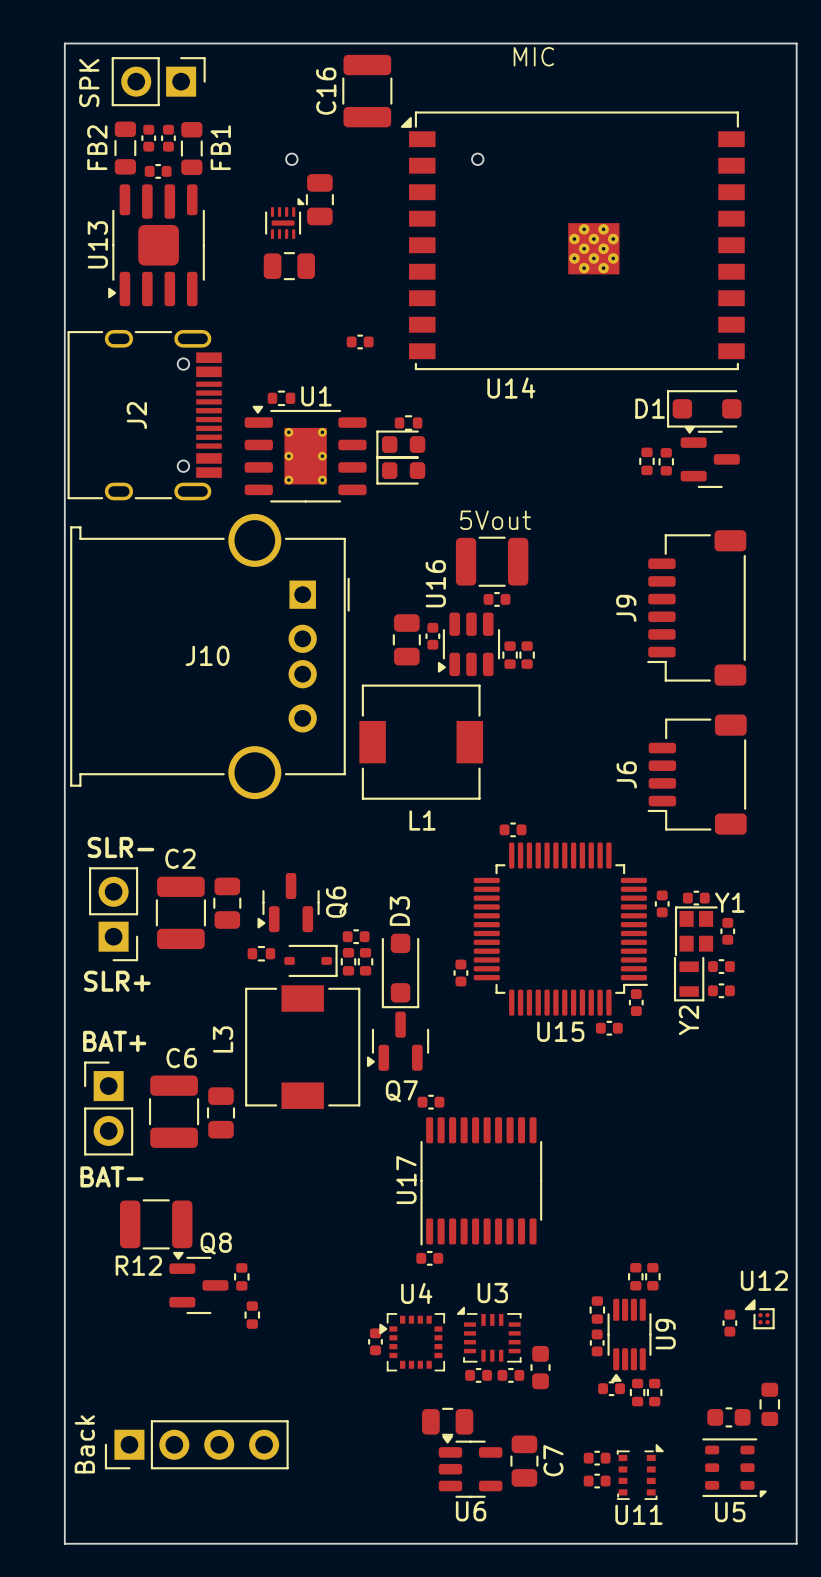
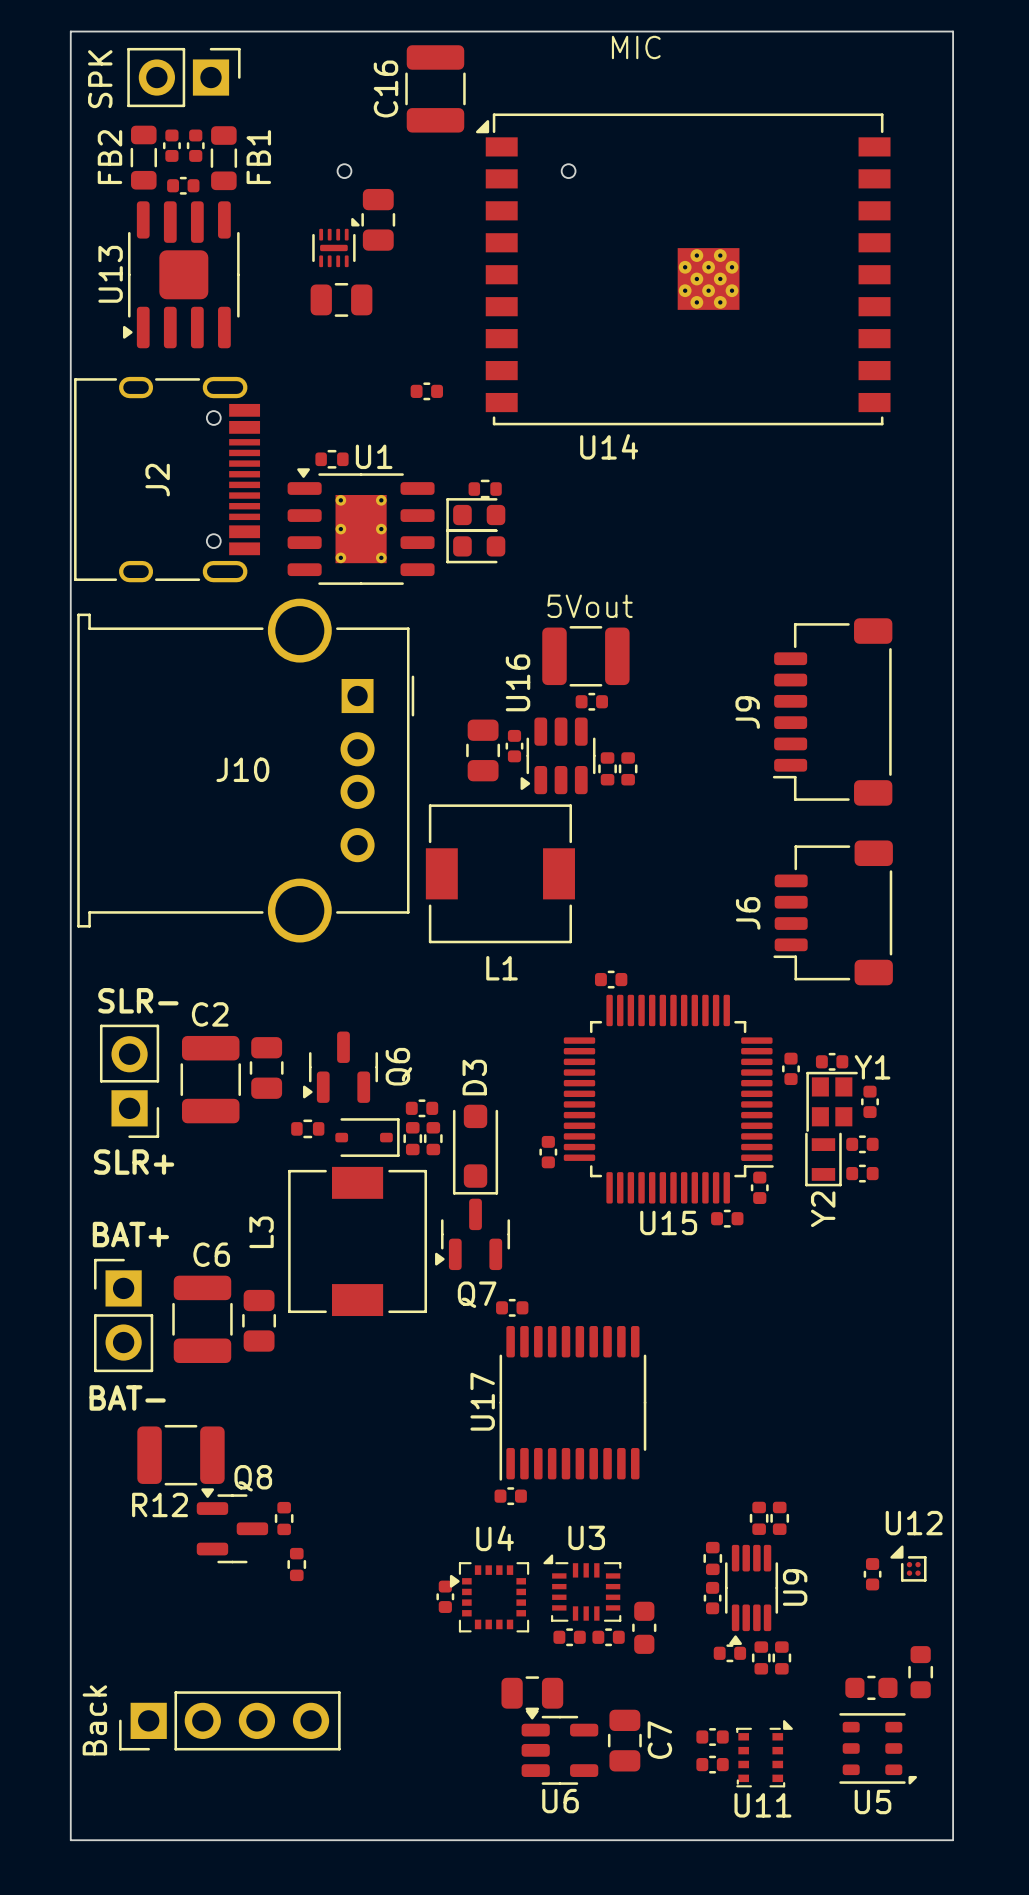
D1: (704, 408) -> none
part: (710, 456) -> none
part: (646, 461) -> none
part: (666, 461) -> none

